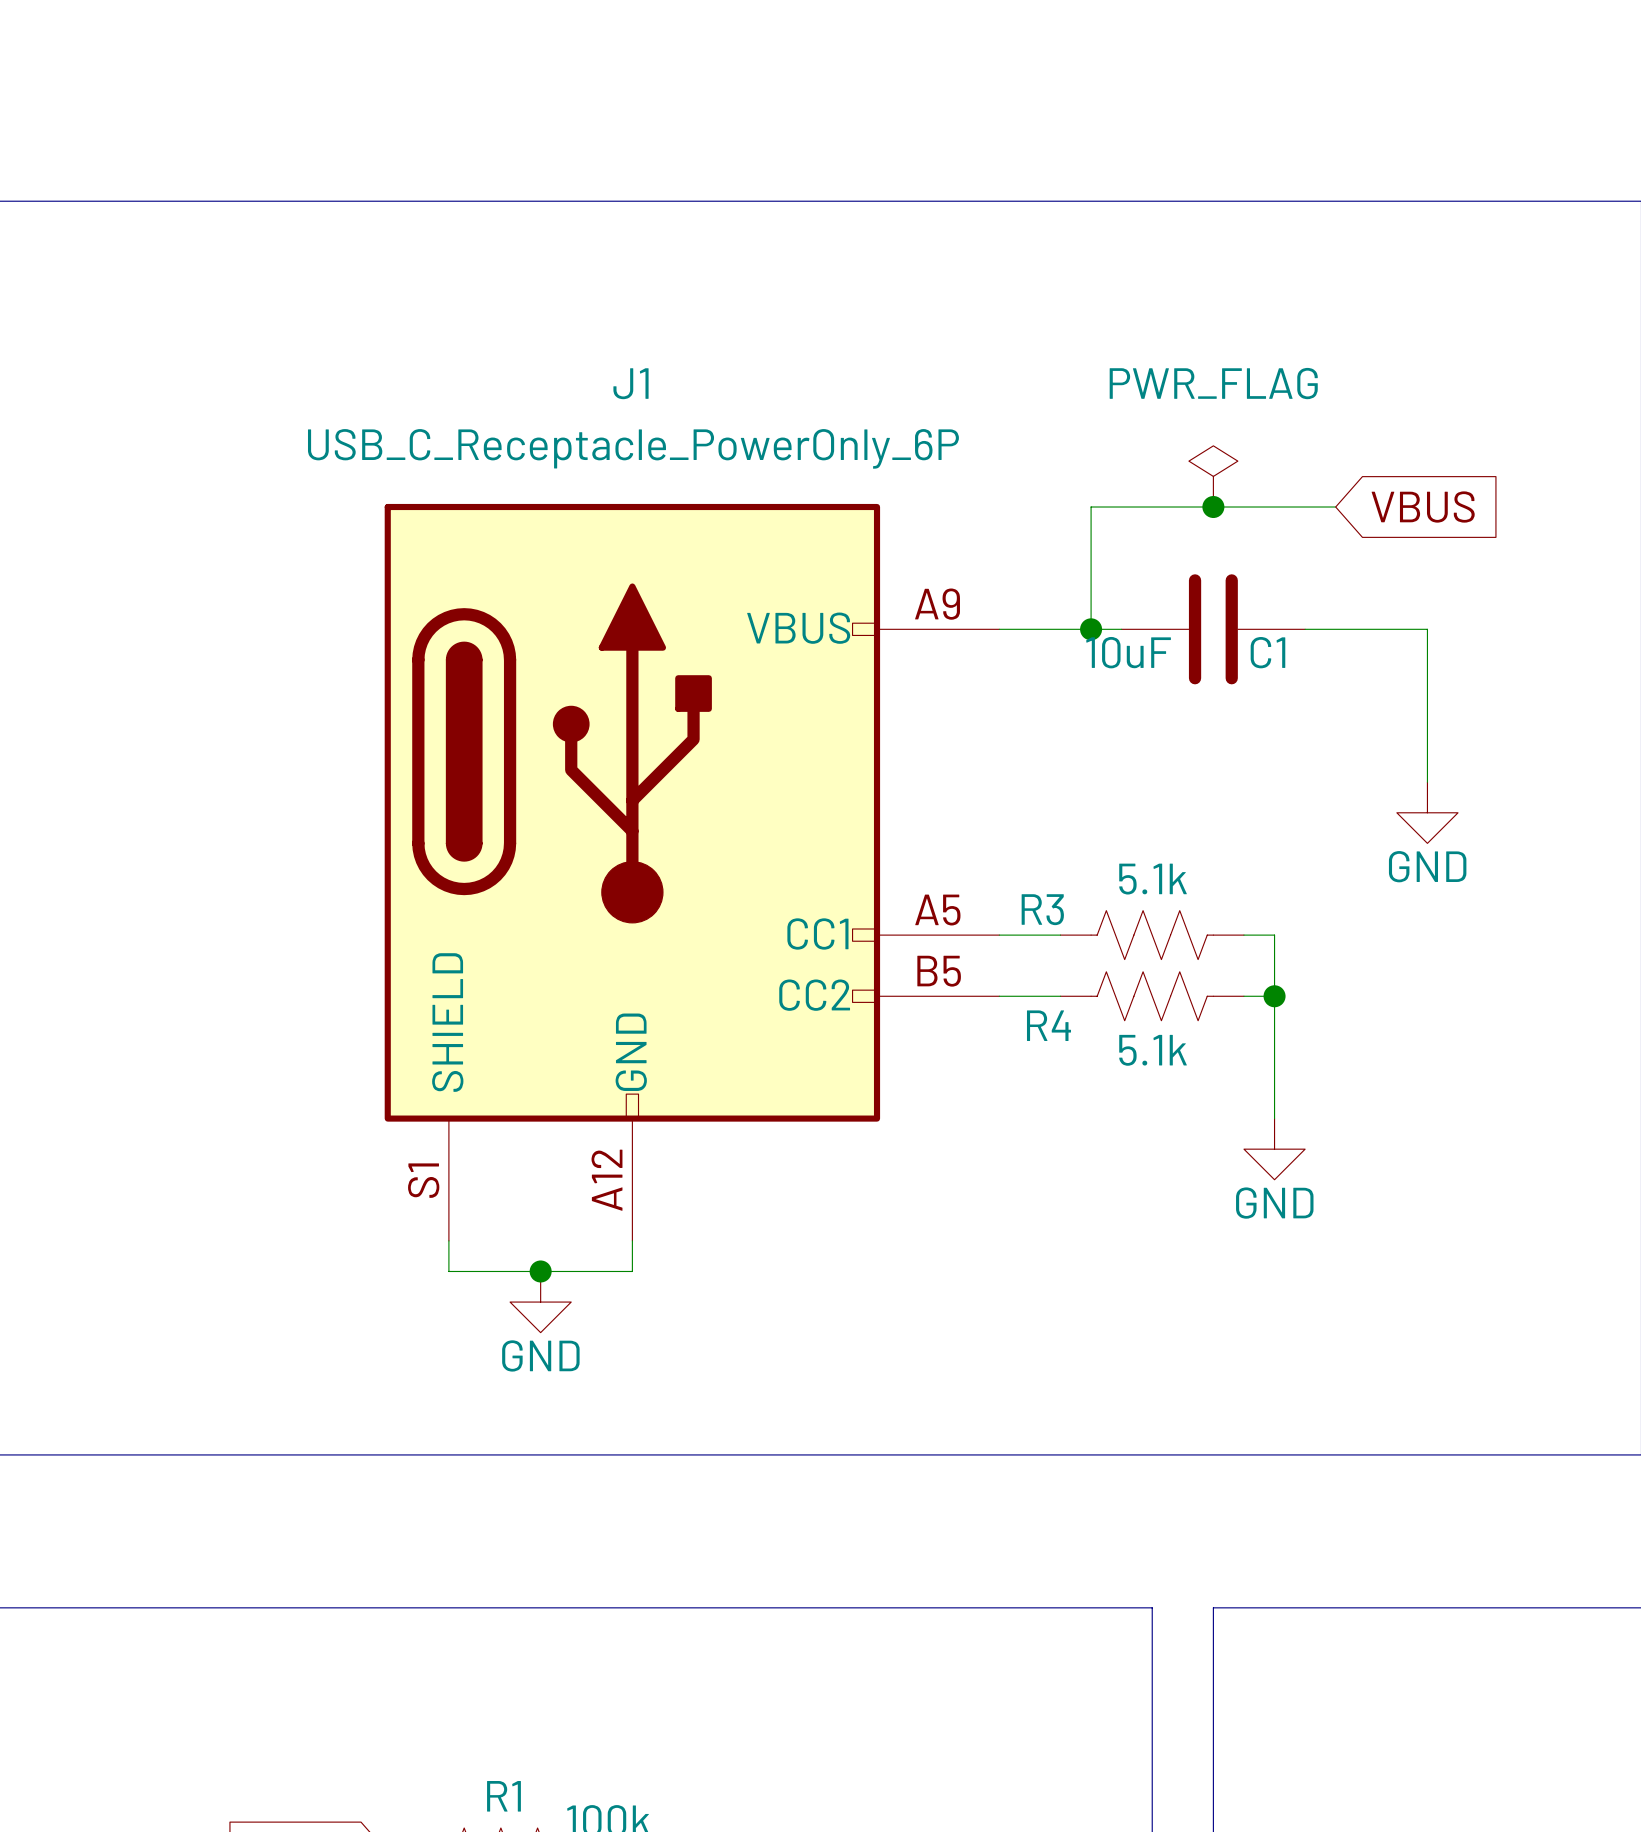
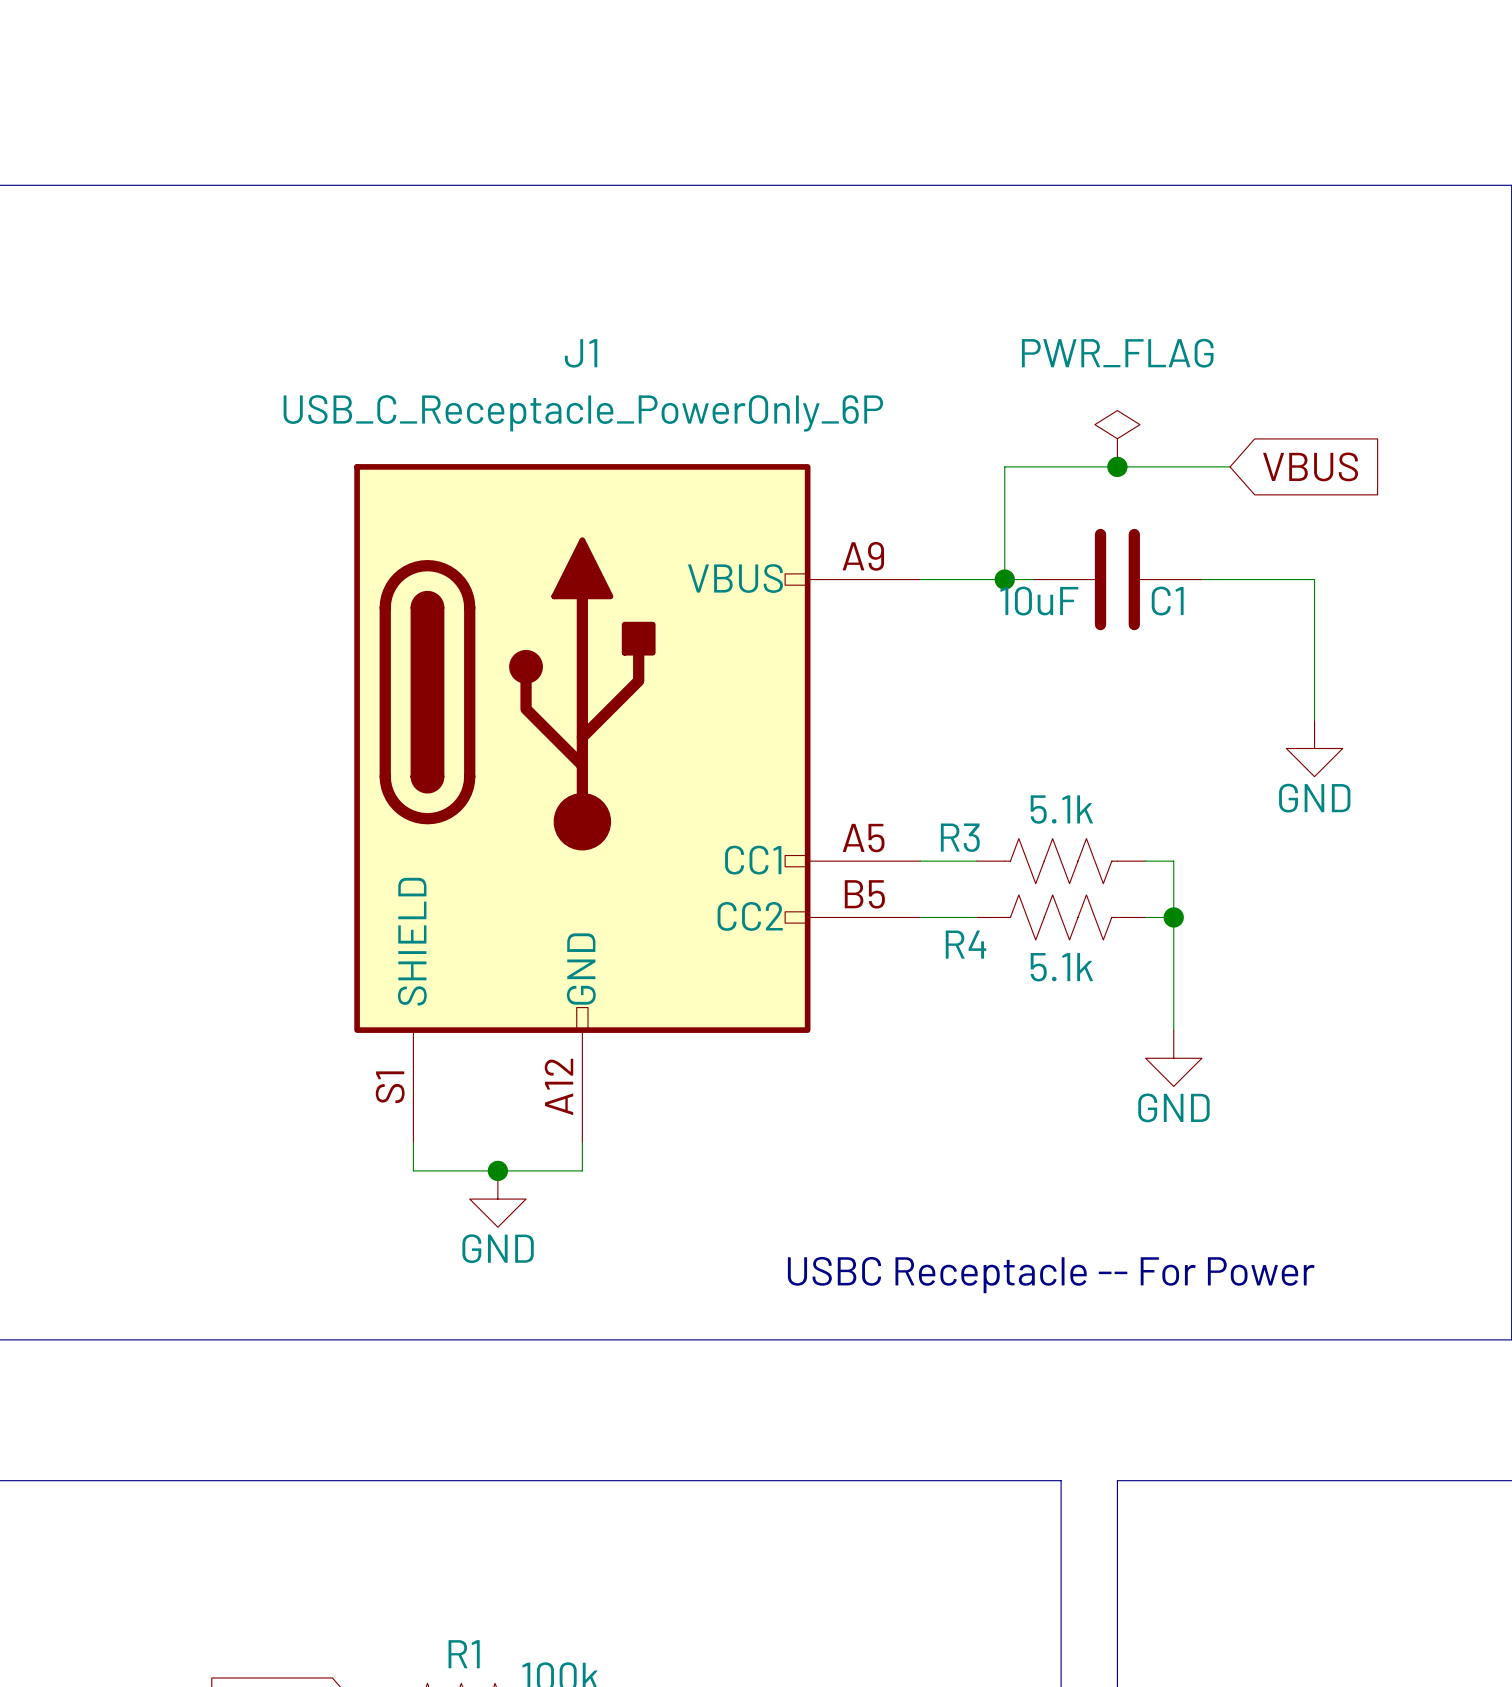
text: none -> USBC Receptacle -- For Power (1051, 1275)

